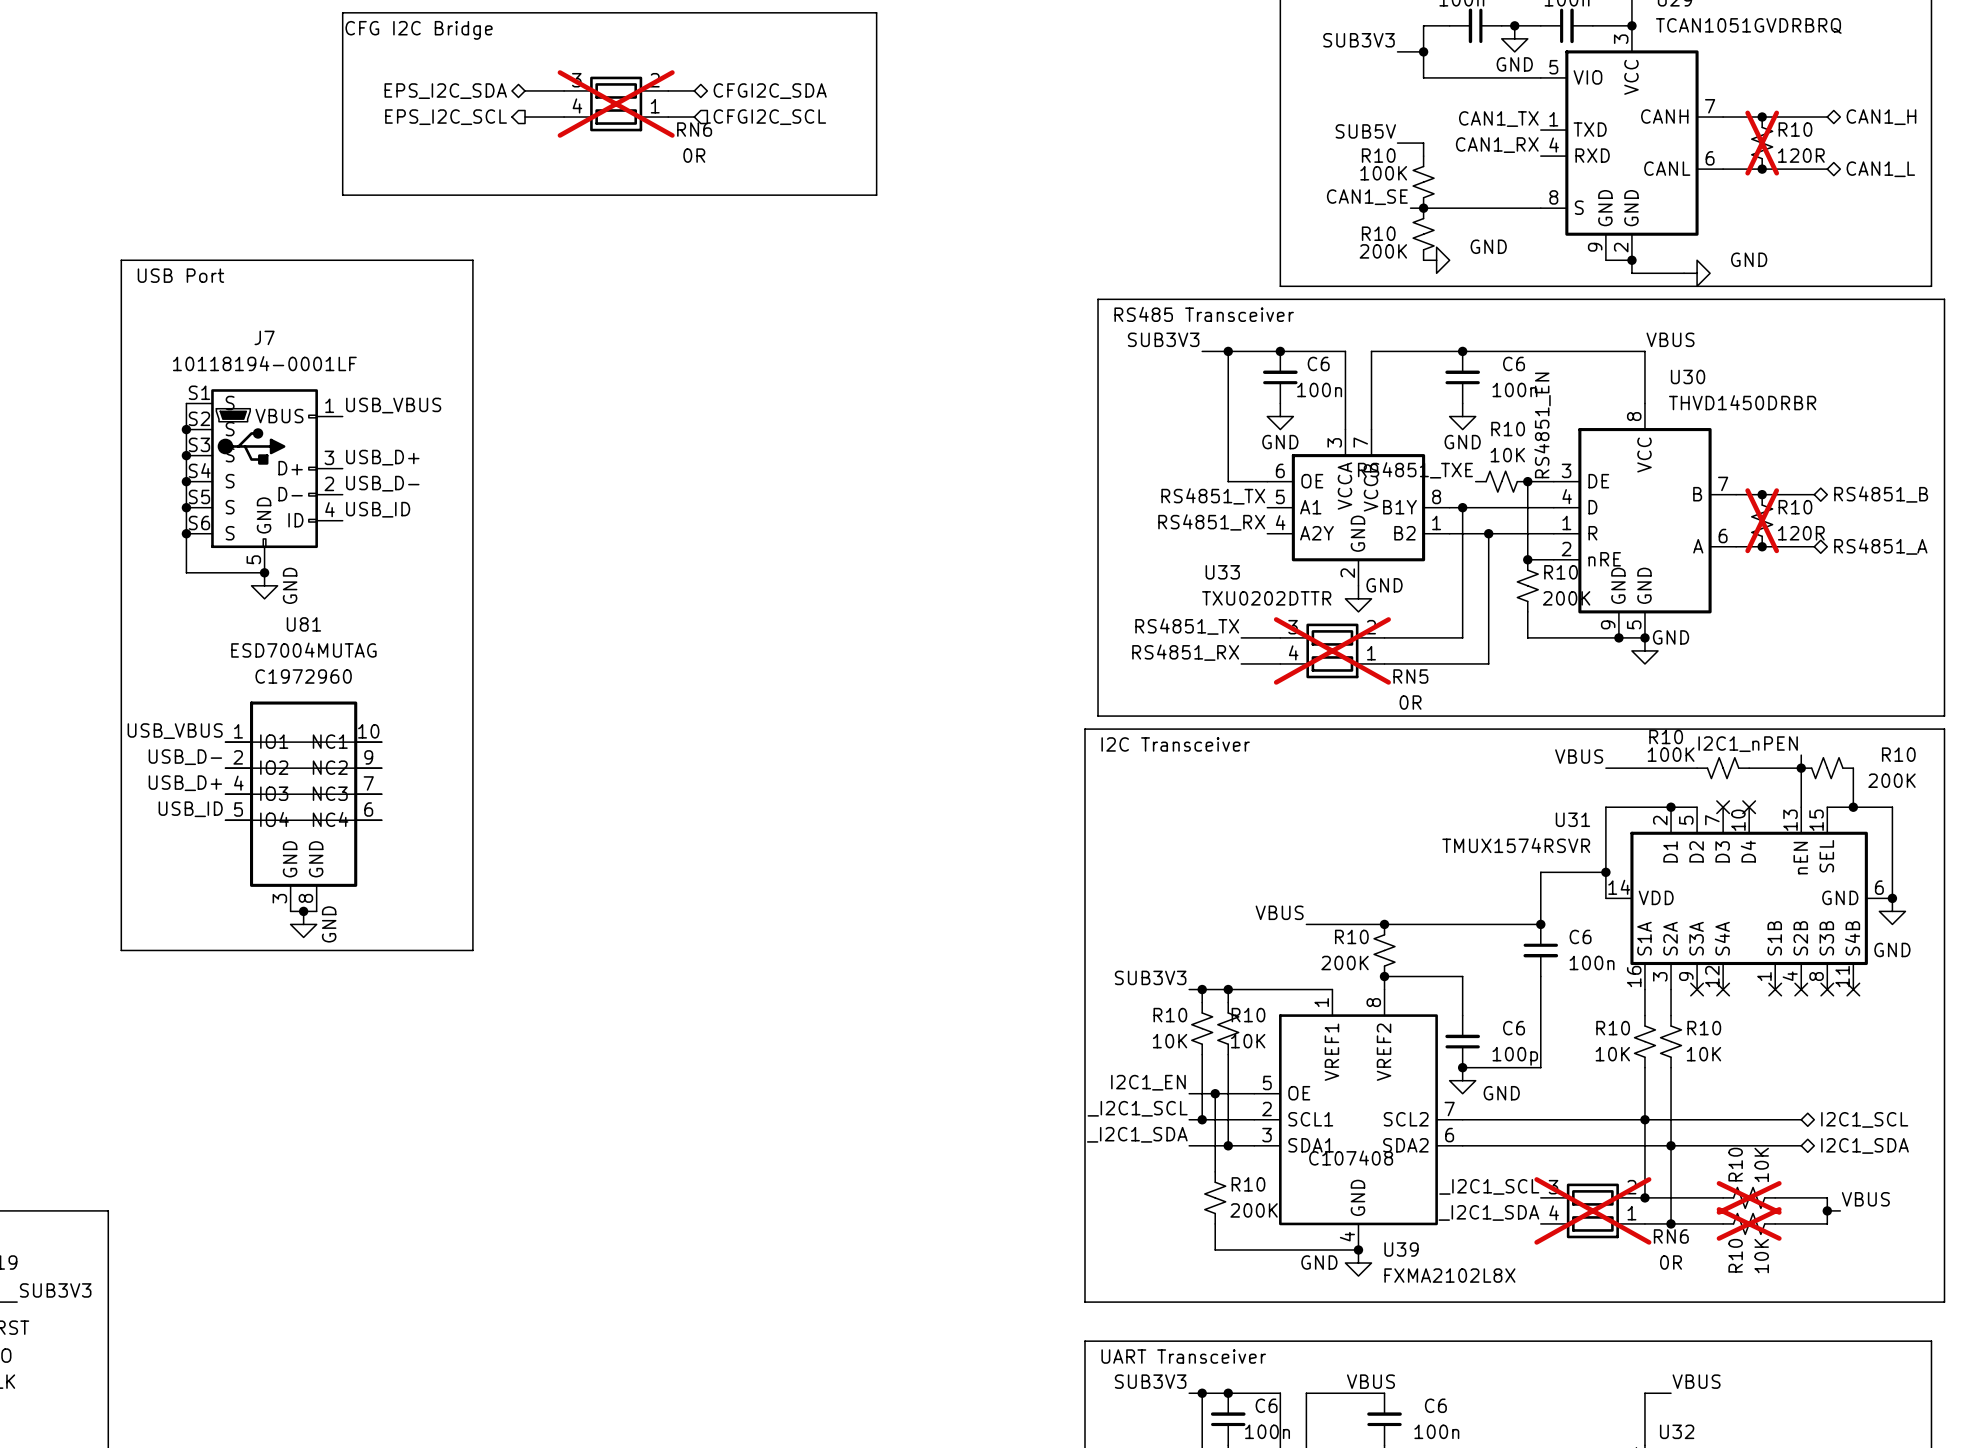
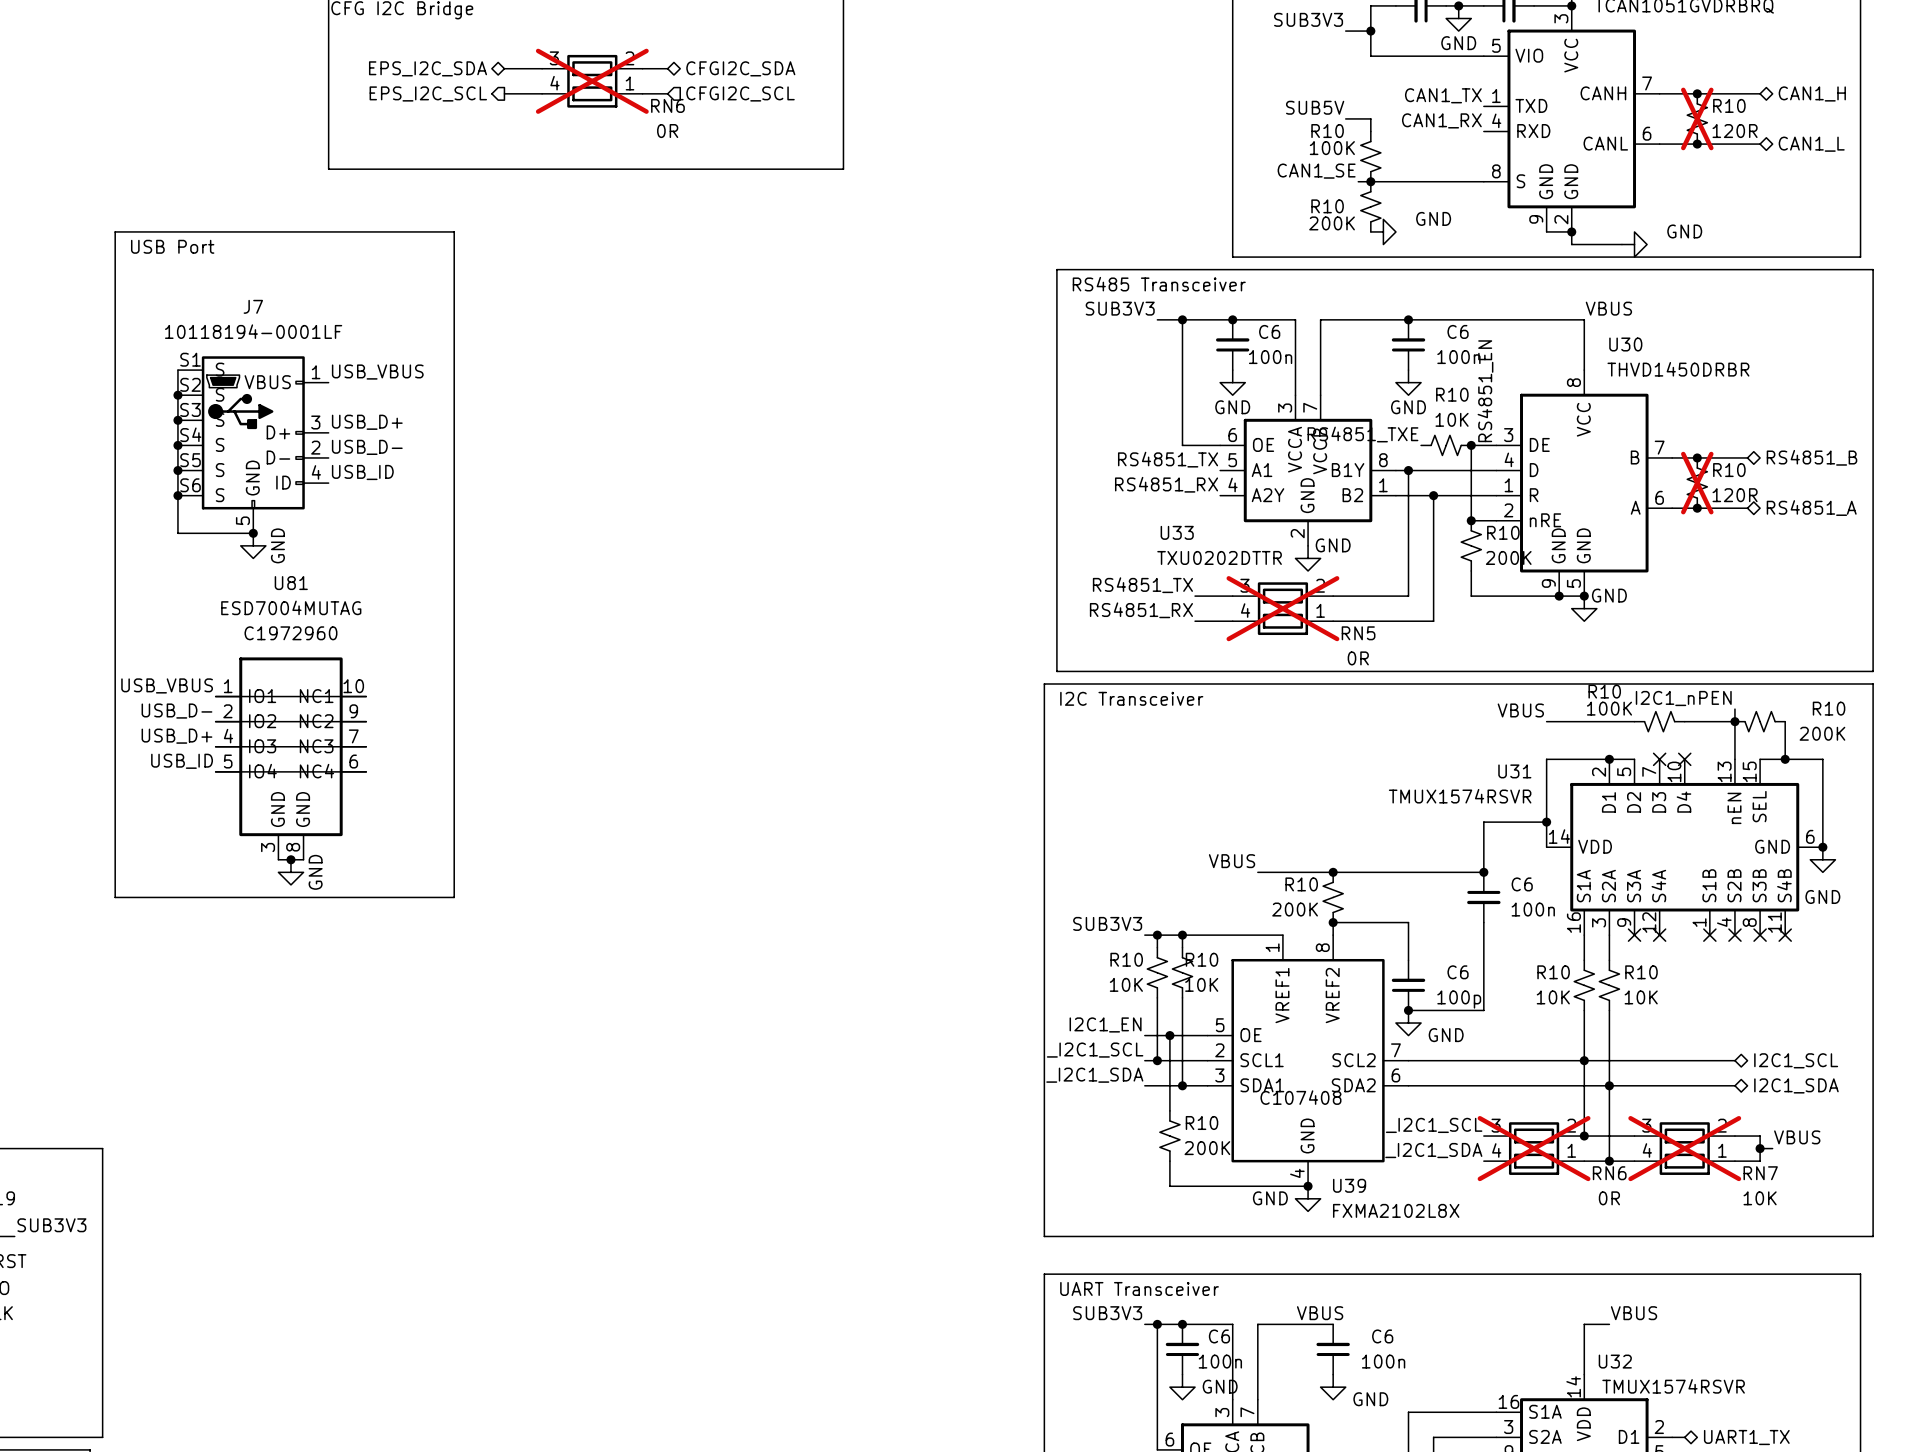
R10: 10K (1749, 1197) -> none
RN7: none -> 10K (1684, 1148)
R10: 10K (1749, 1223) -> none

